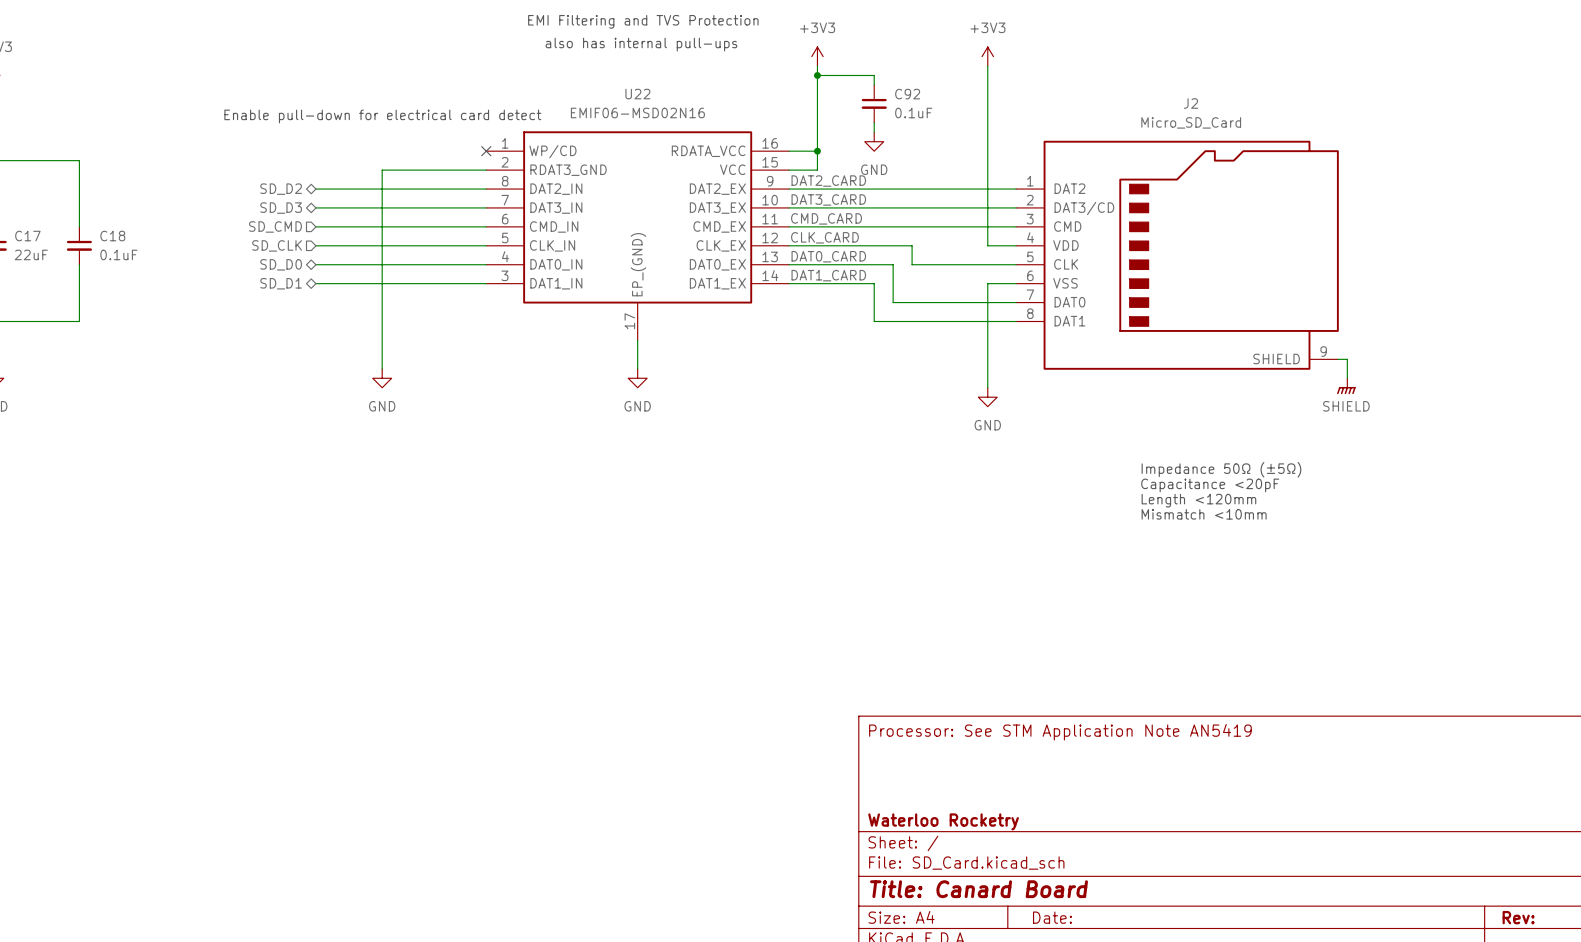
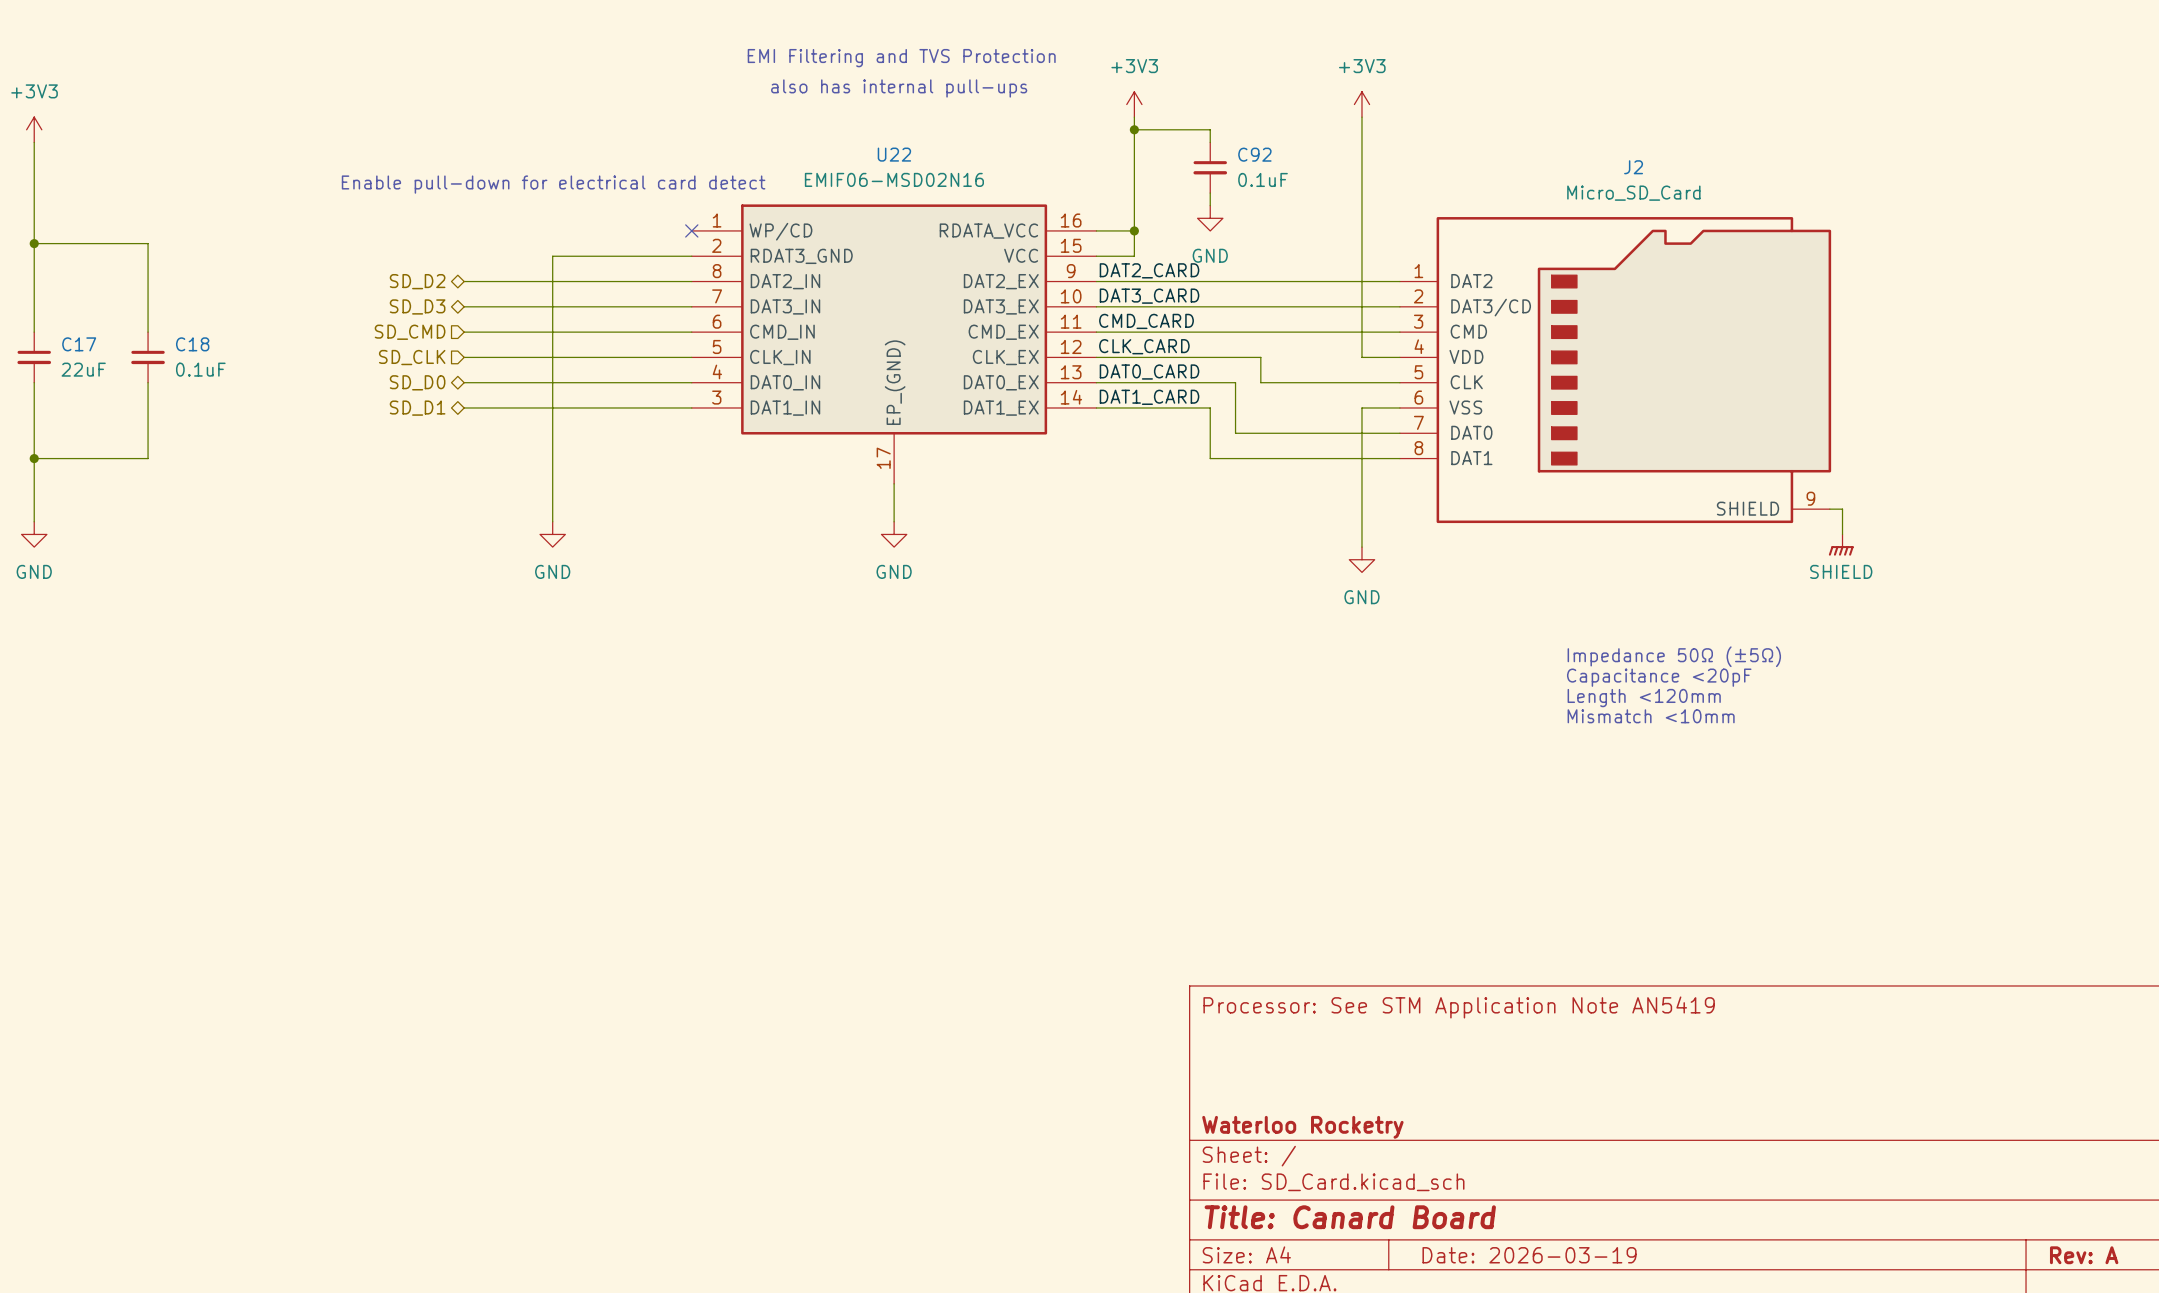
title block: Date: (1052, 917) -> Date: 2026-03-19 (1529, 1255)
title block: Rev: (1518, 917) -> Rev: A (2084, 1255)

